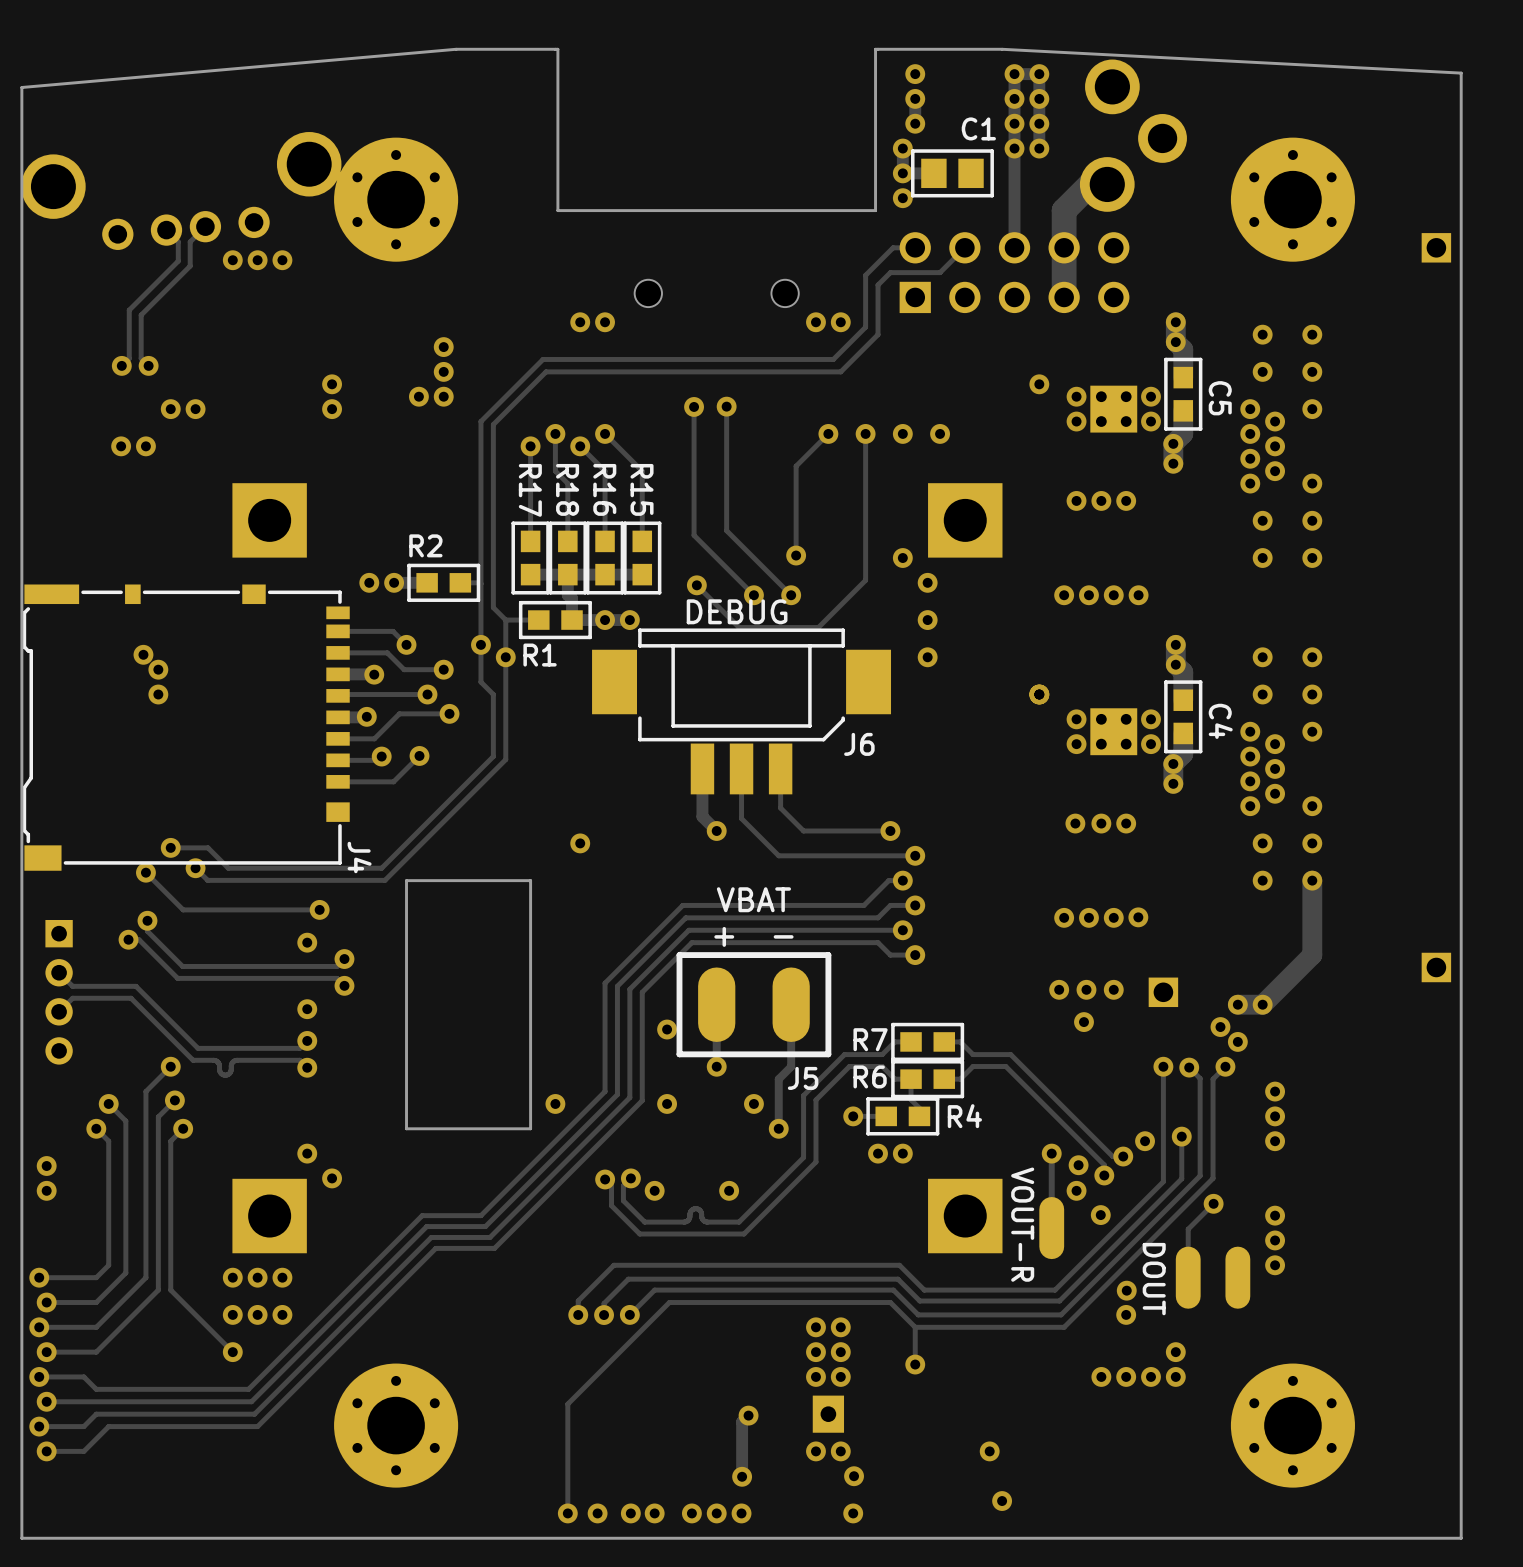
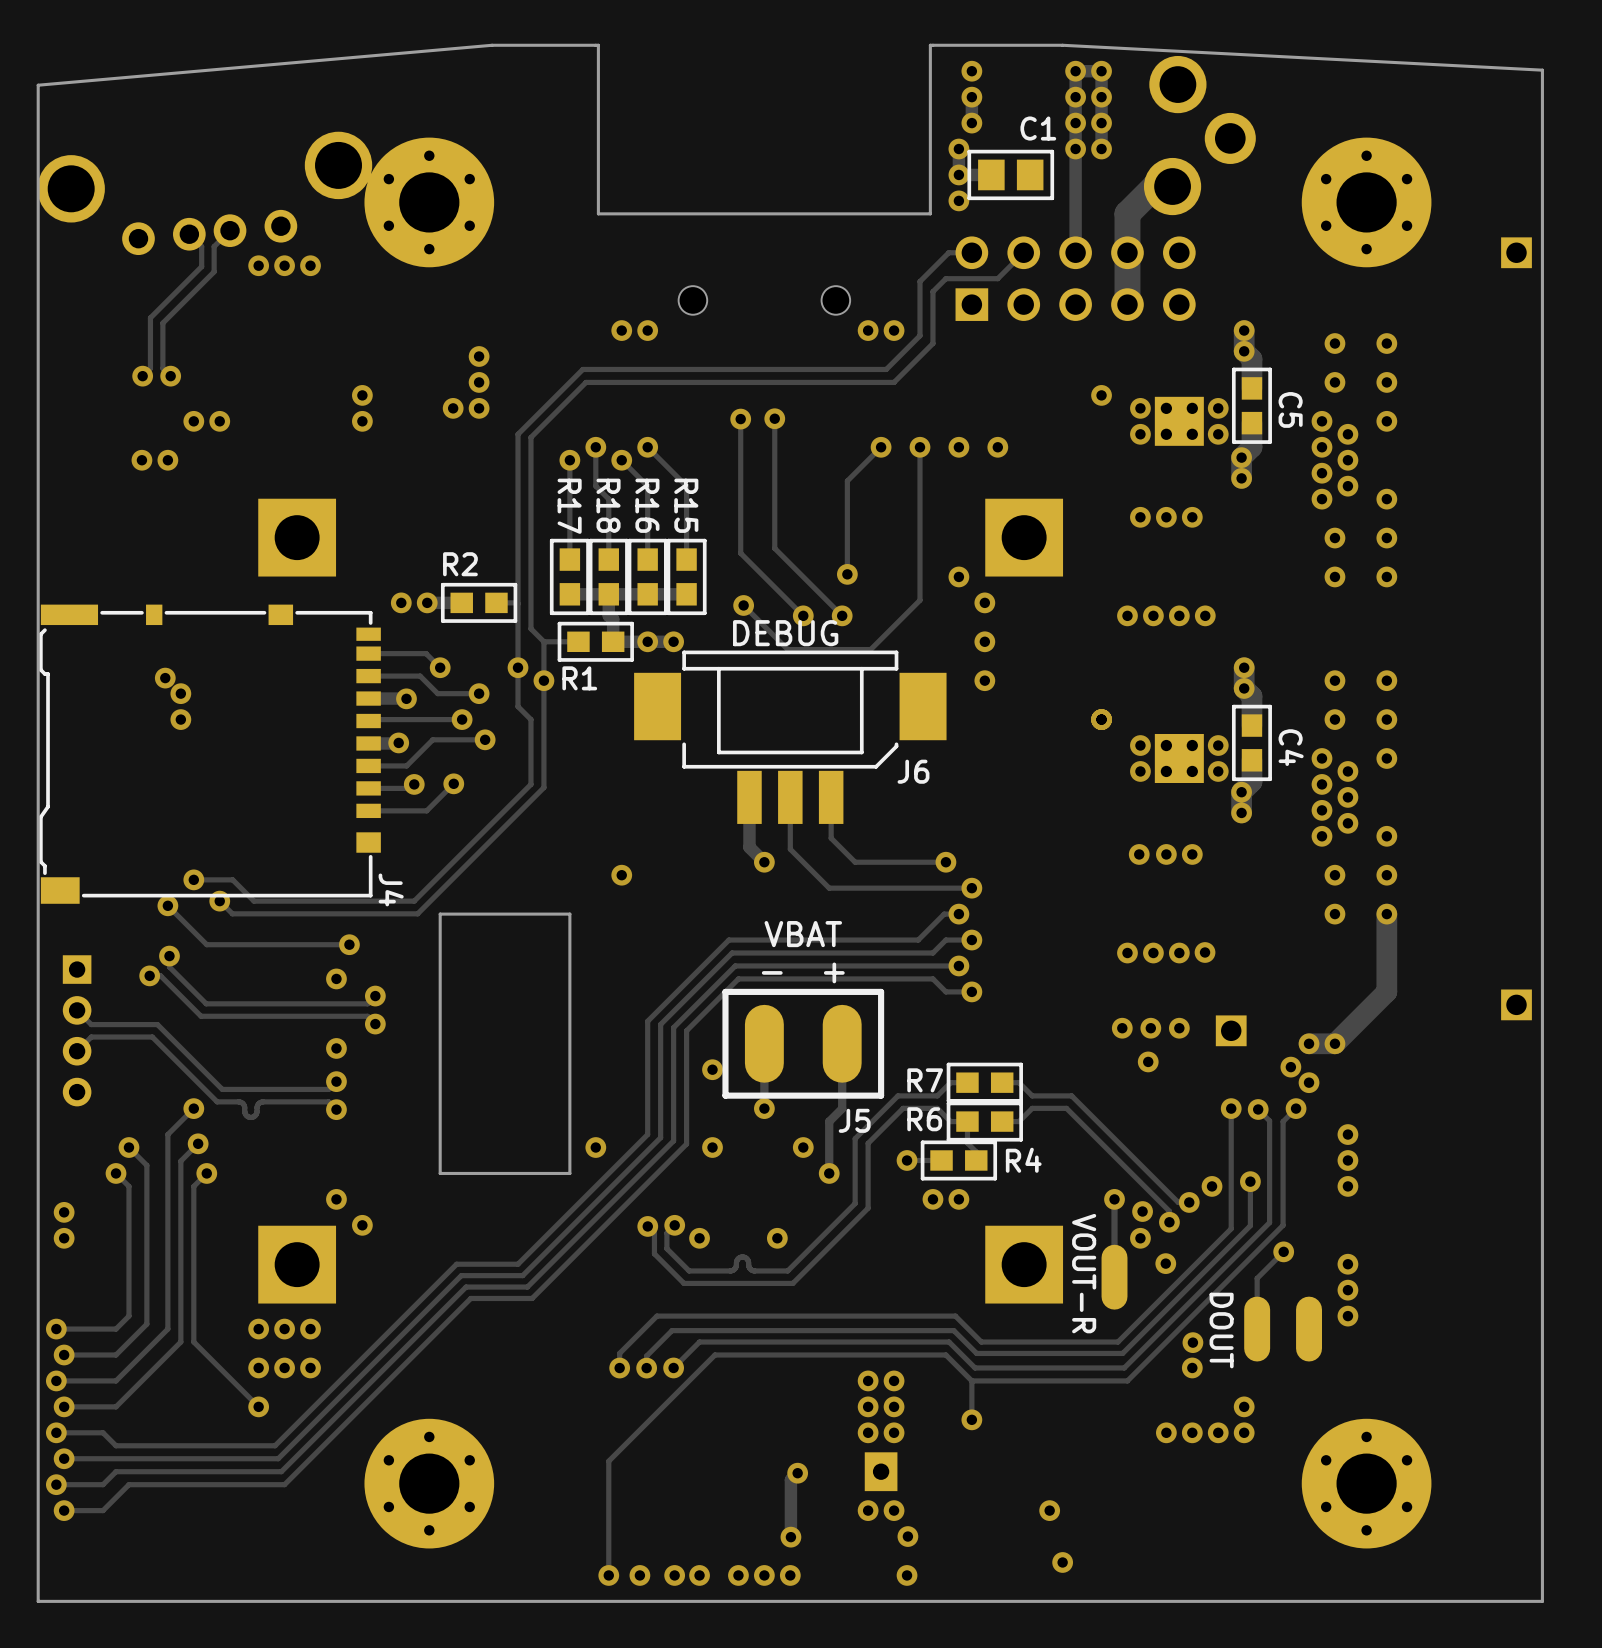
text: + - (753, 936) -> - + (803, 972)

